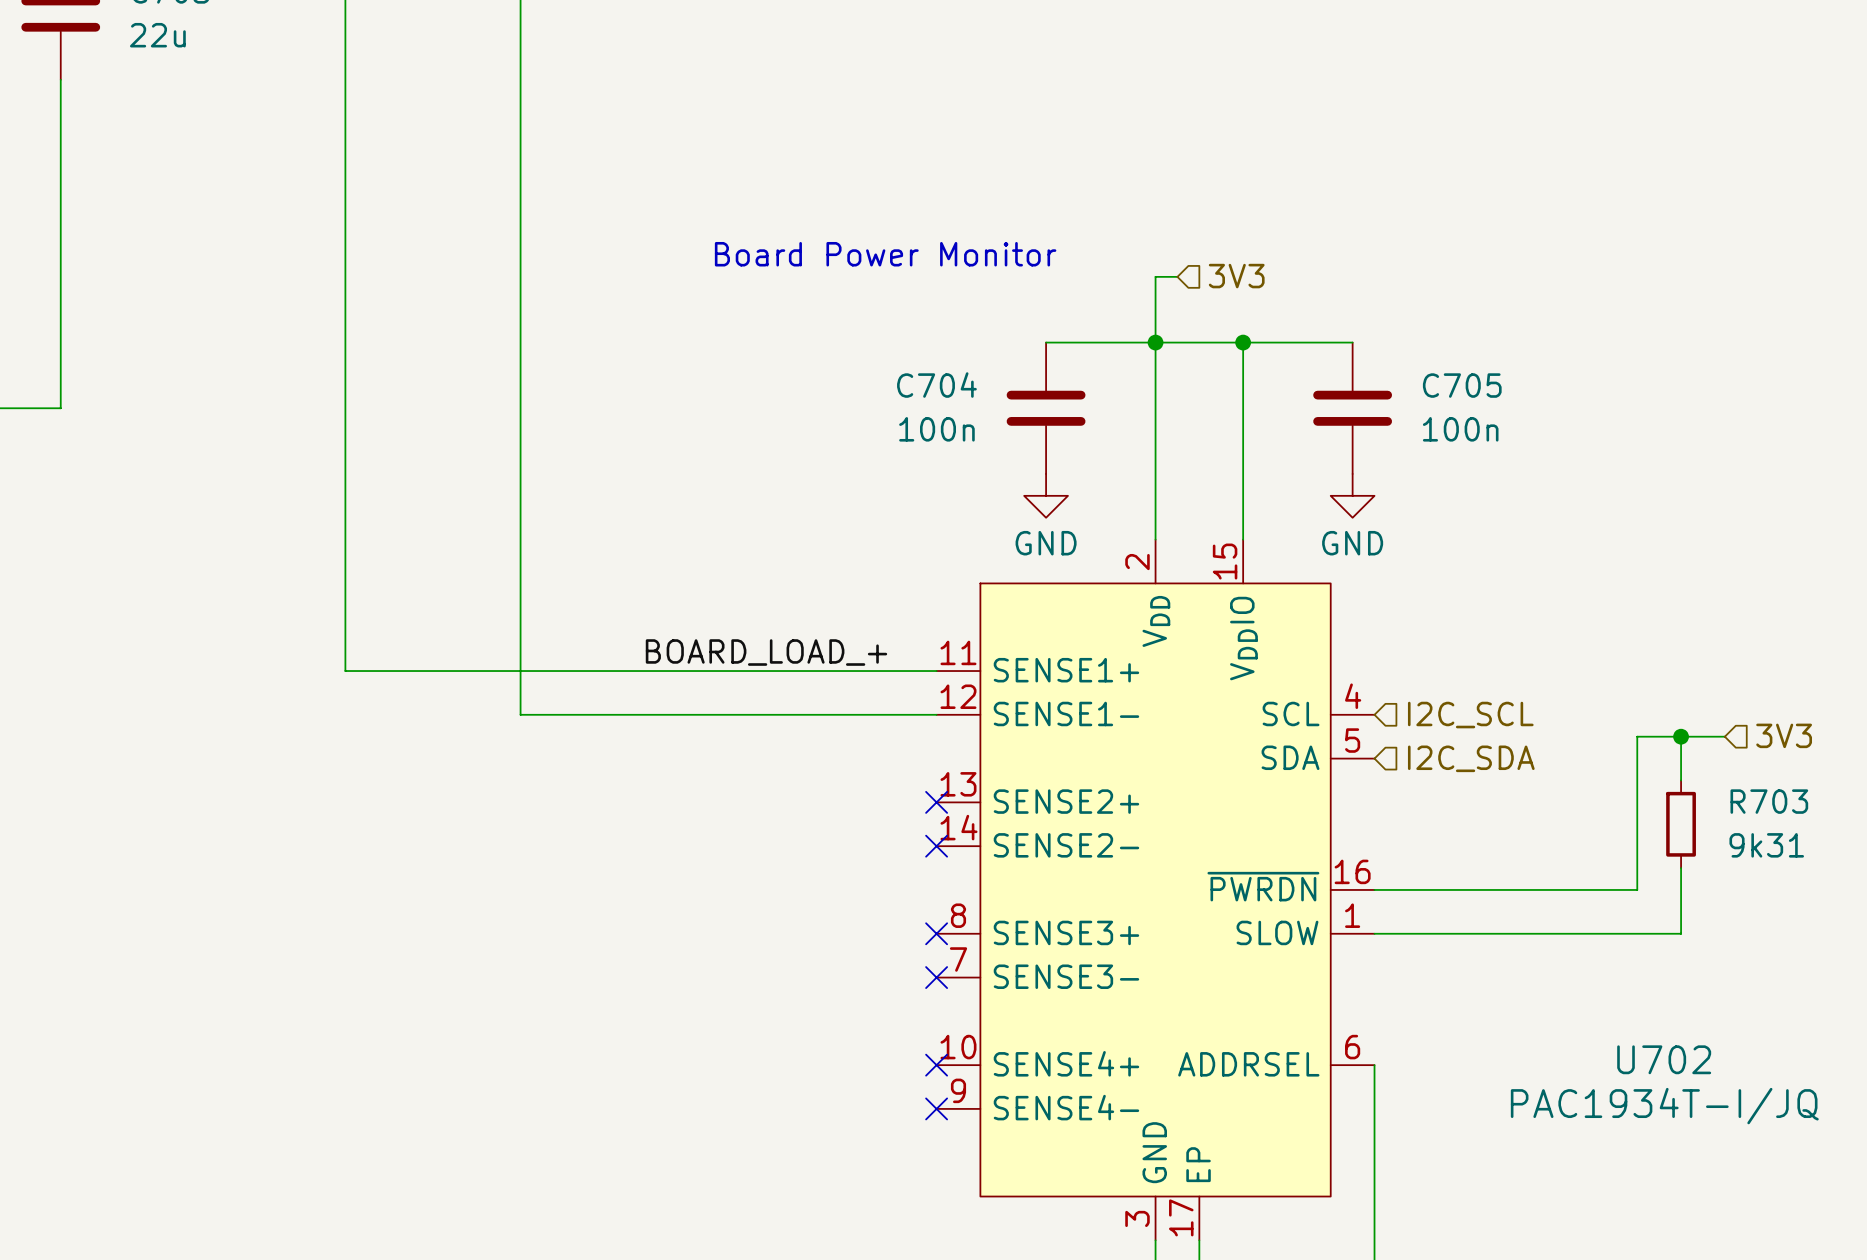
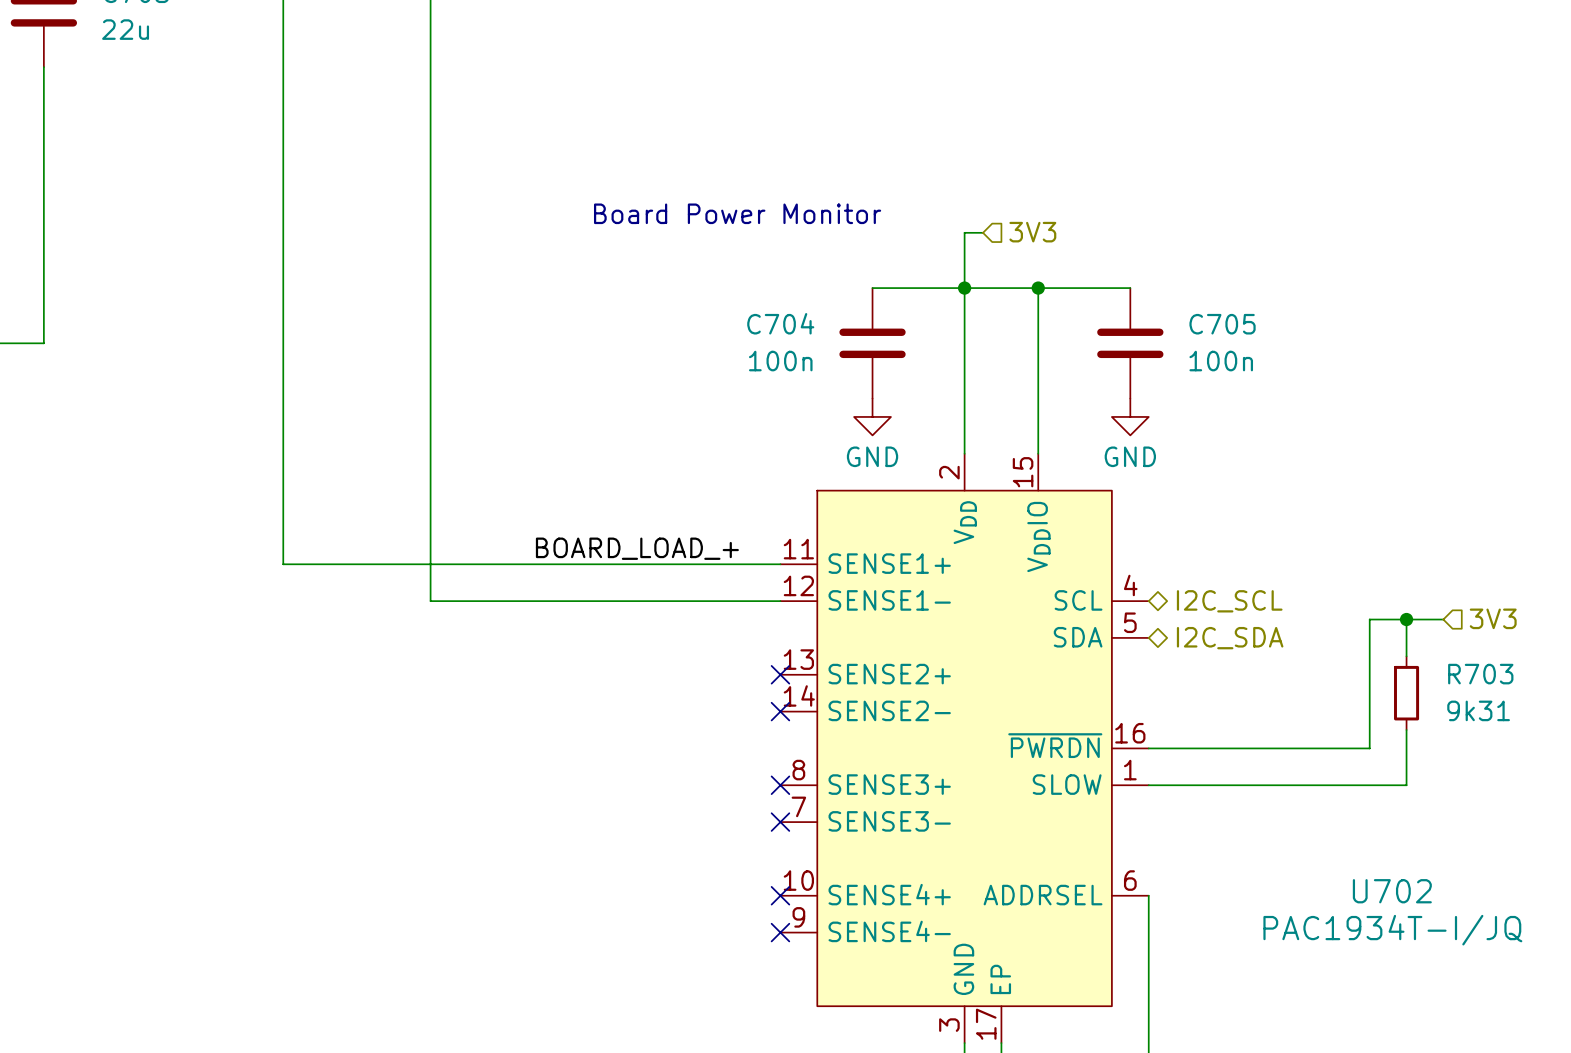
hierarchical label shape: input (1470, 715) -> bidirectional (1229, 601)
hierarchical label shape: input (1471, 758) -> bidirectional (1230, 638)

